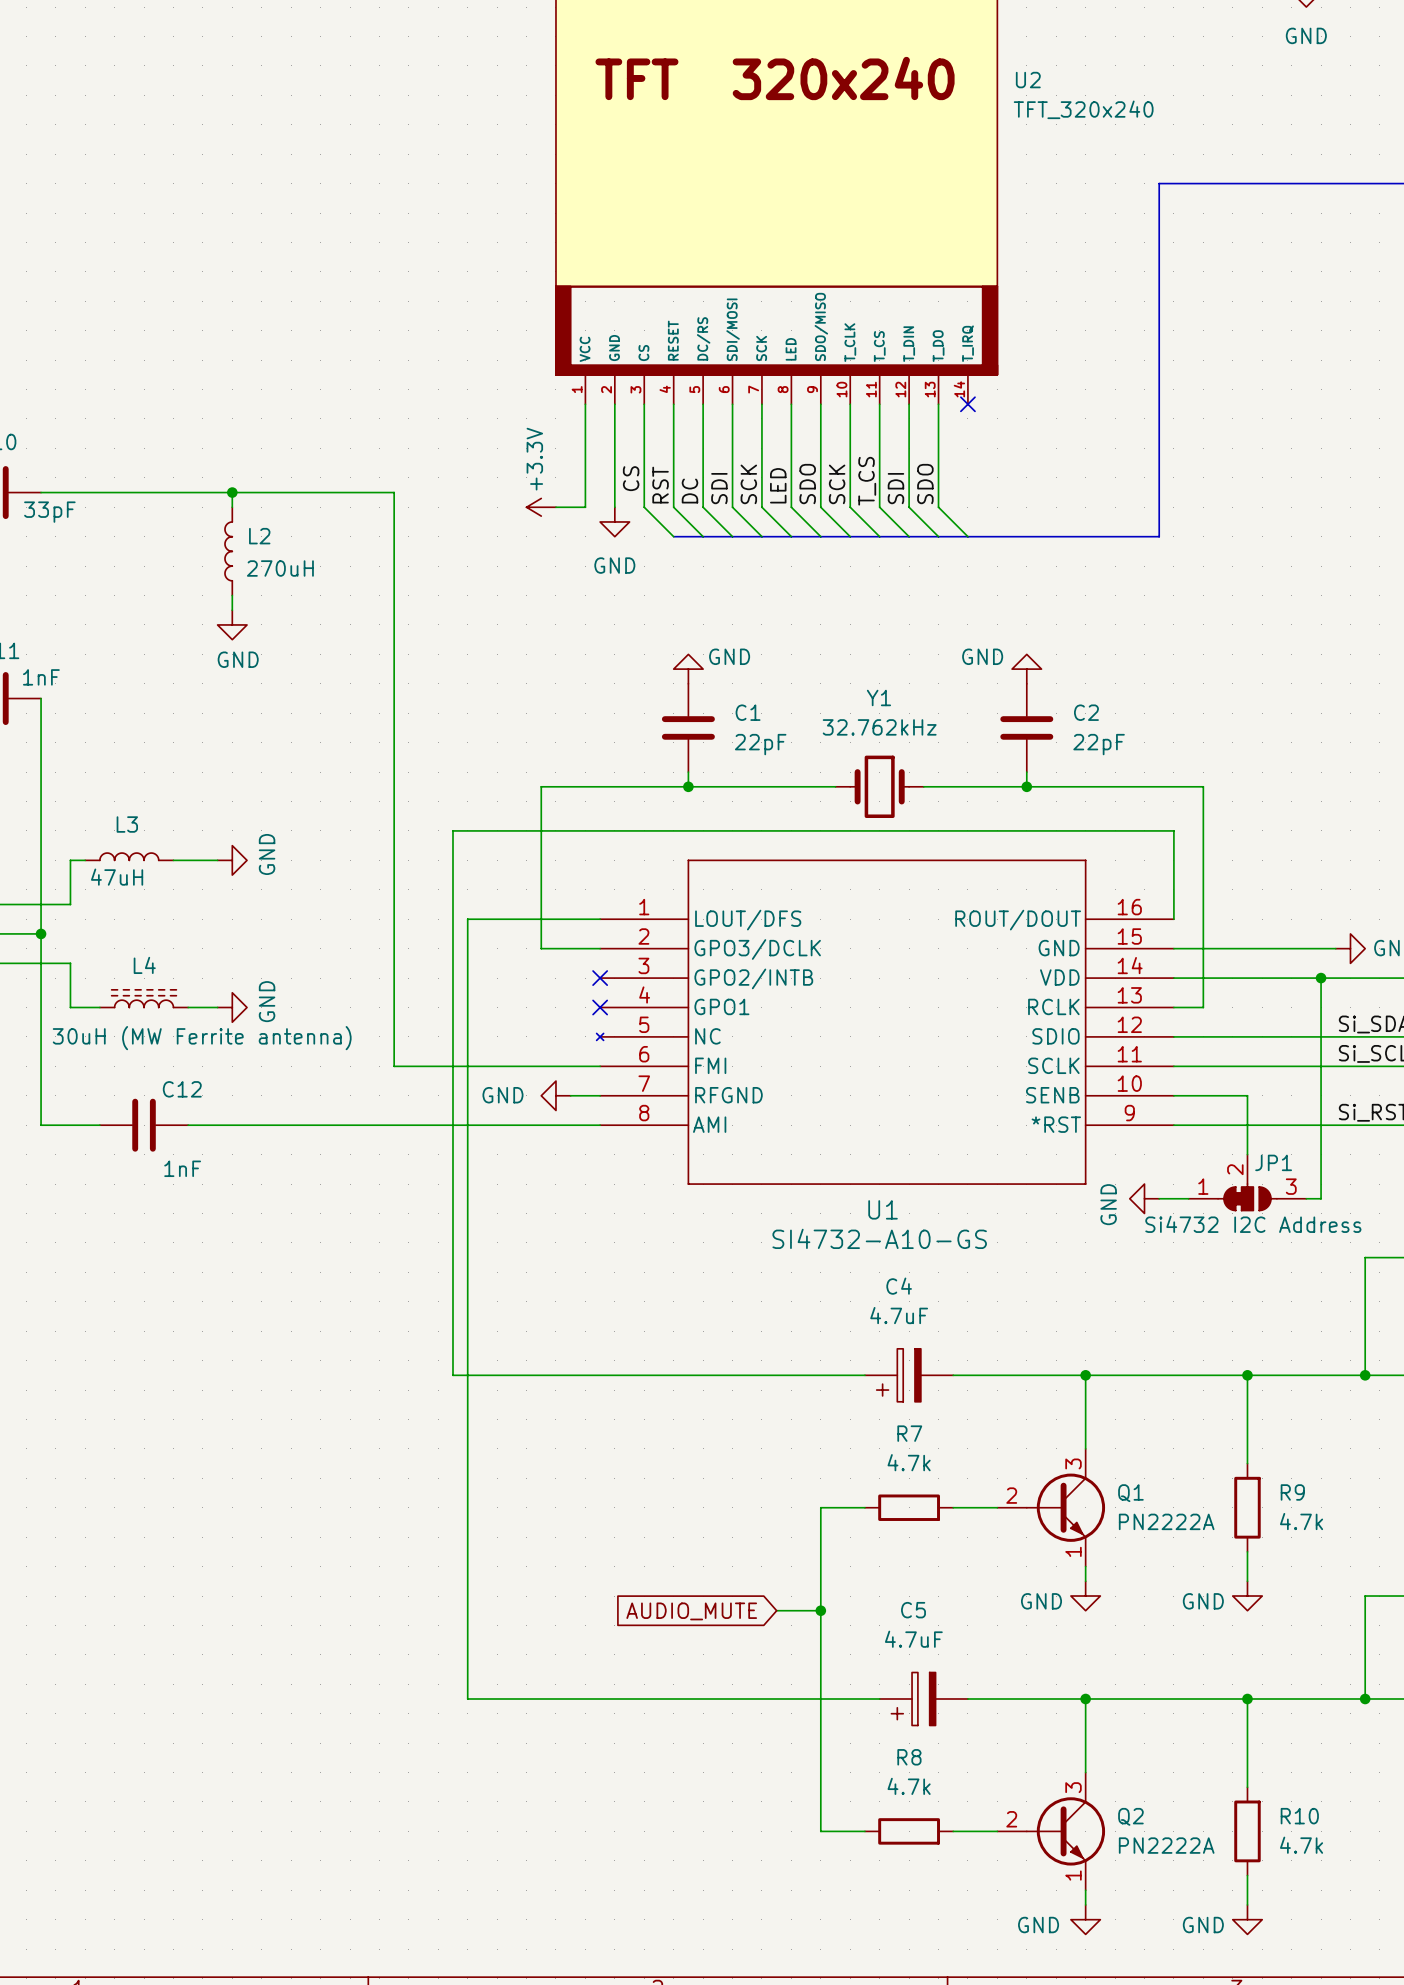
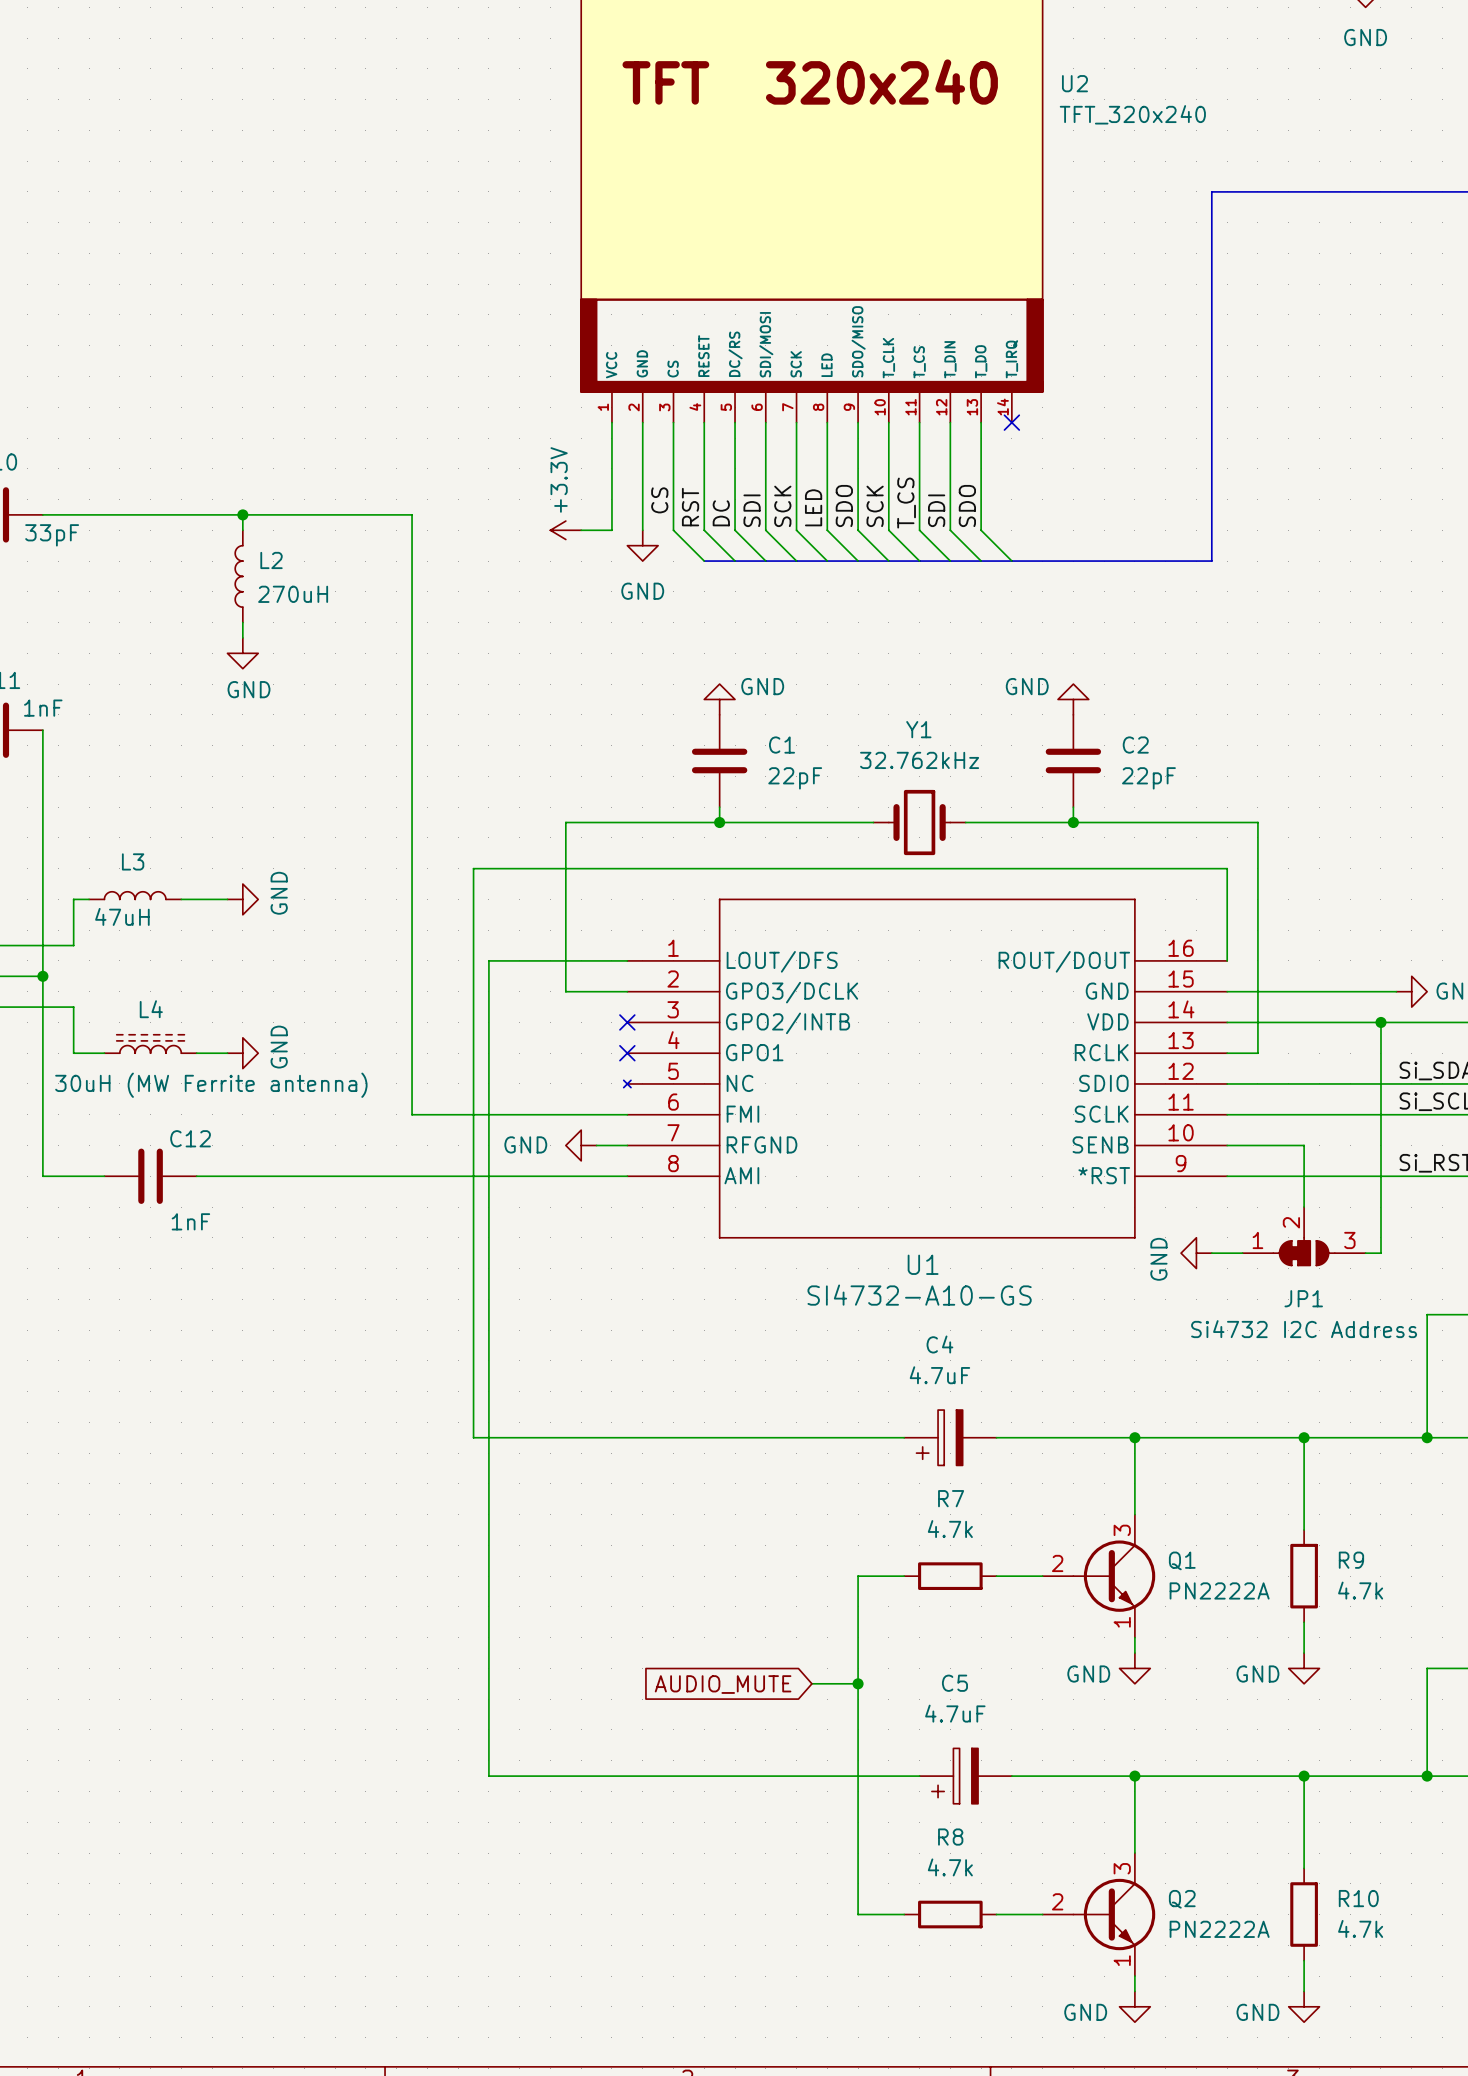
JP1 name position: JP1 (1273, 1162) -> JP1 (1303, 1298)
JP1 value position: Si4732 I2C Address (1253, 1224) -> Si4732 I2C Address (1304, 1329)

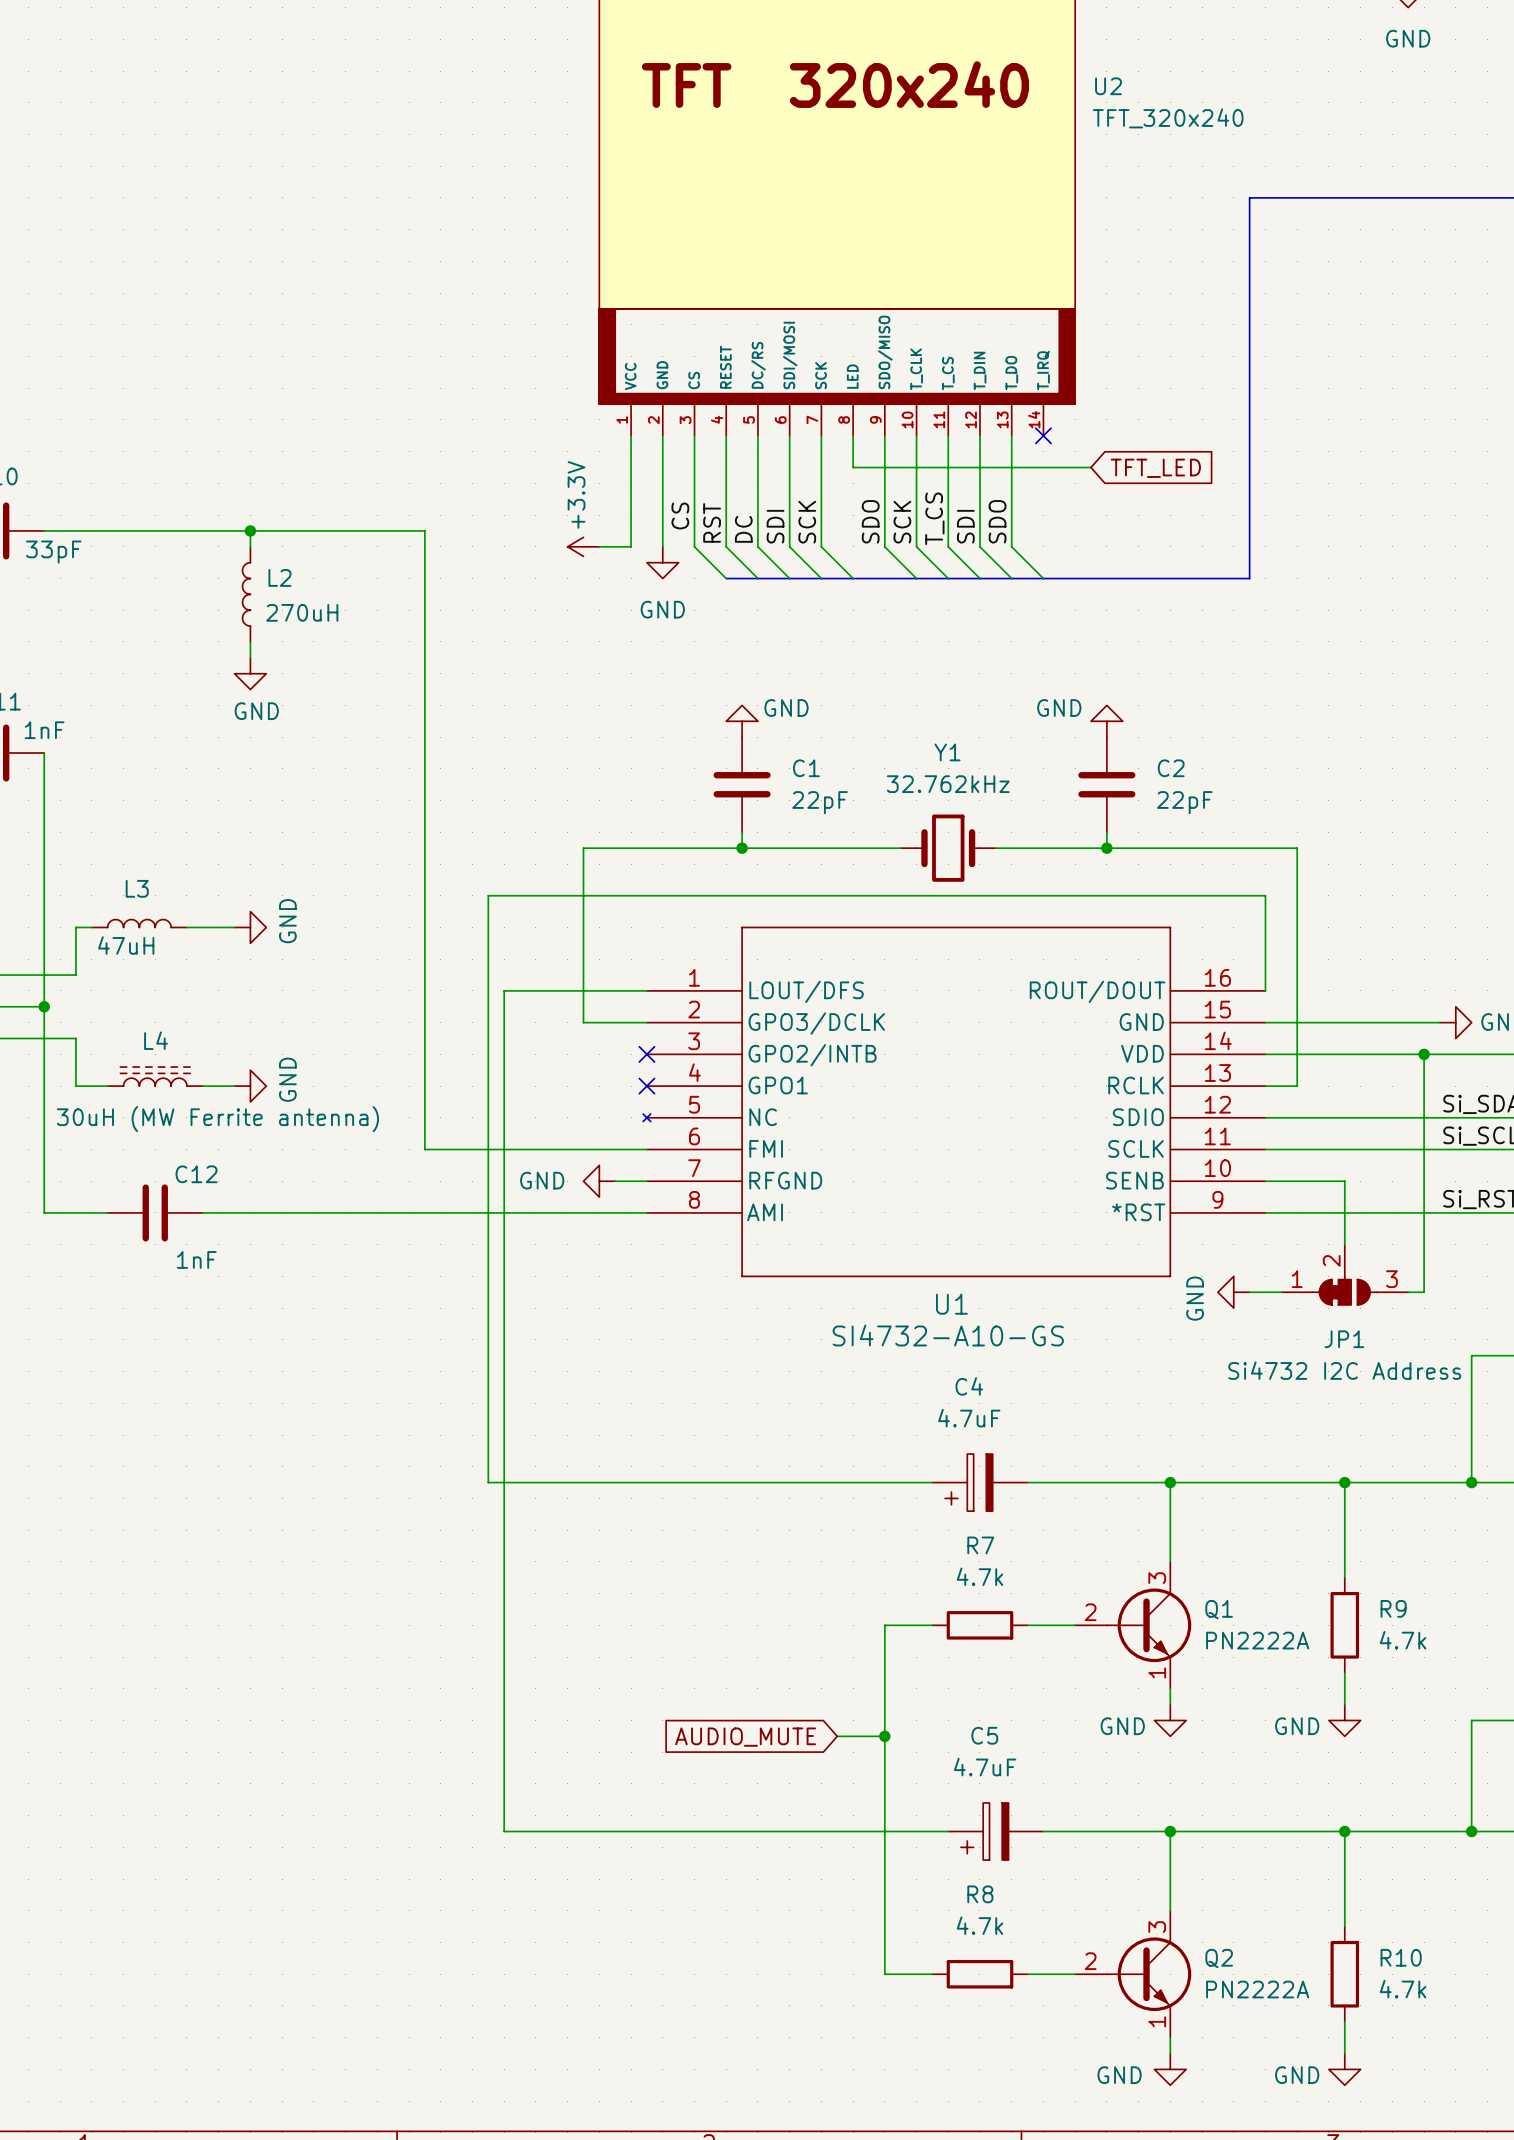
wire: (827, 453) (827, 530) (858, 561) -> (853, 467) (1091, 467)
global label: none -> TFT_LED (1155, 468)
label: LED (813, 507) -> none

